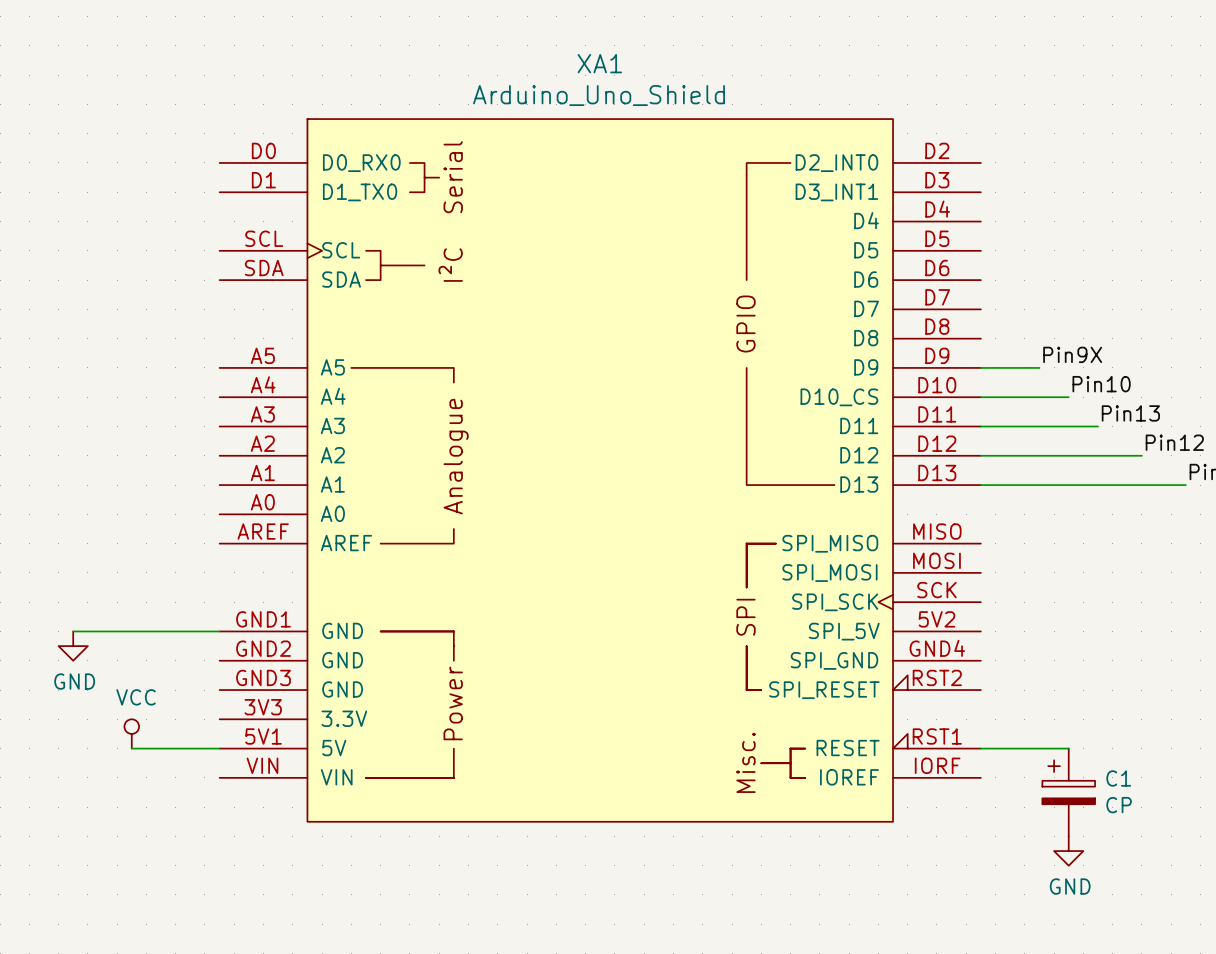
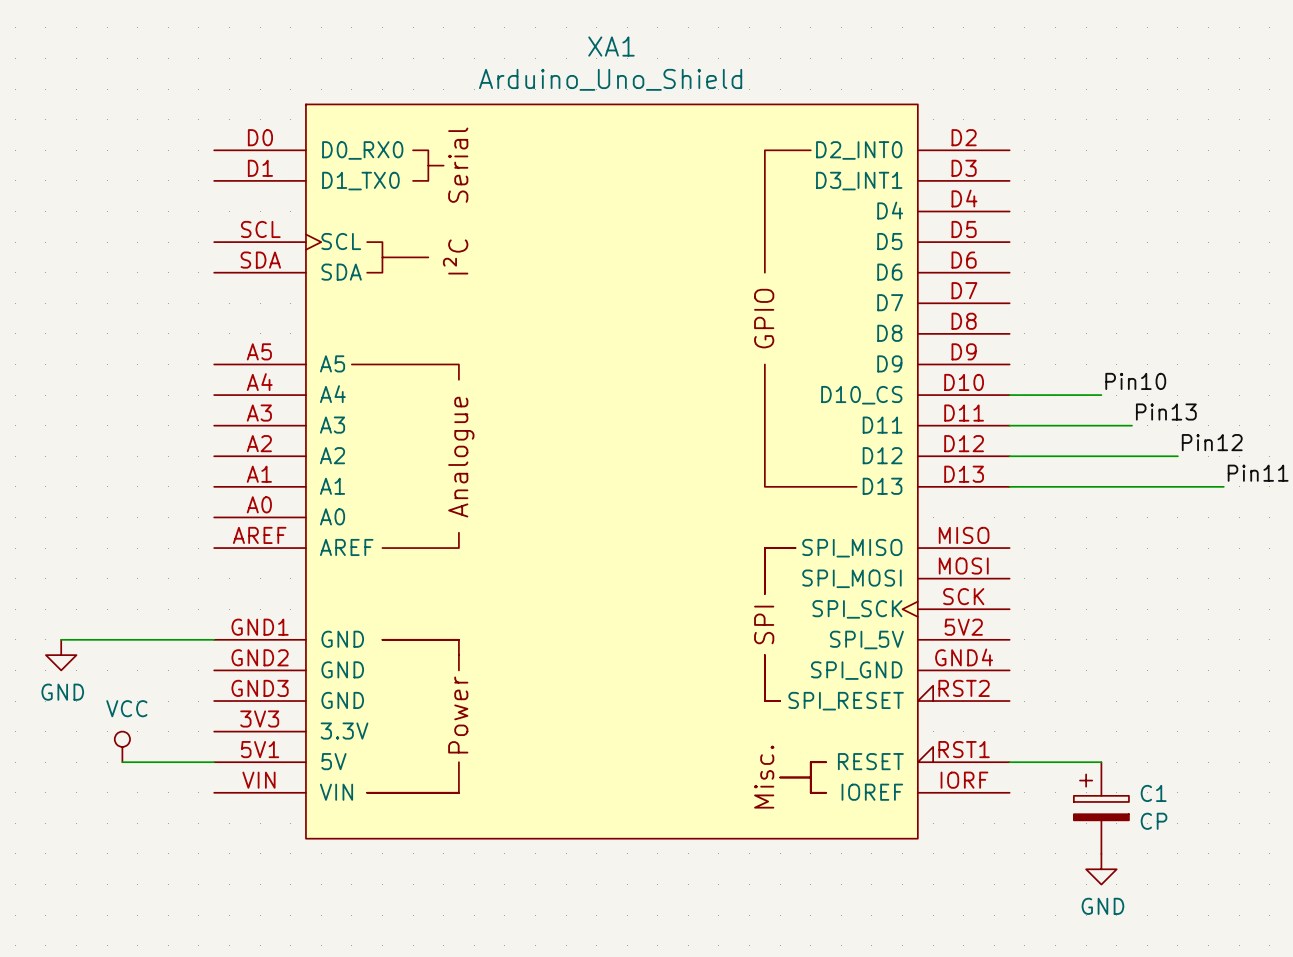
label: Pin9X (1072, 354) -> none
wire: (980, 367) (1039, 367) -> none

